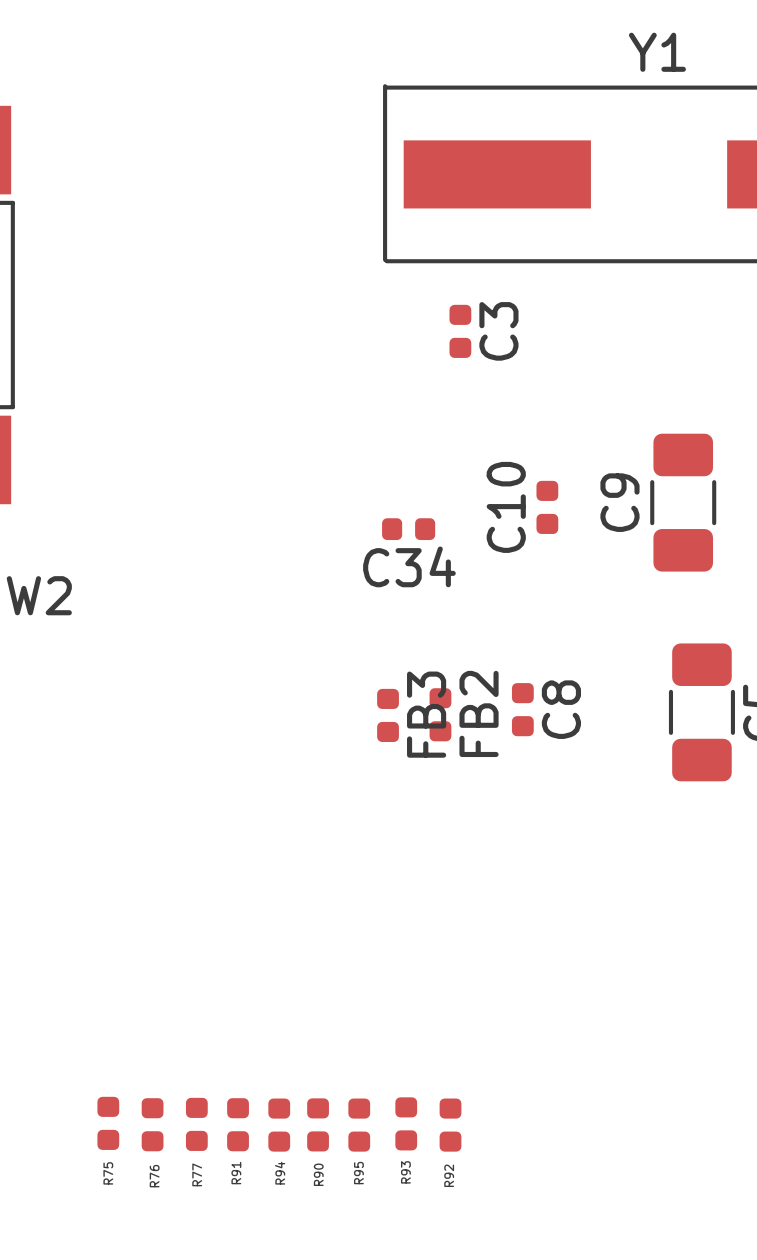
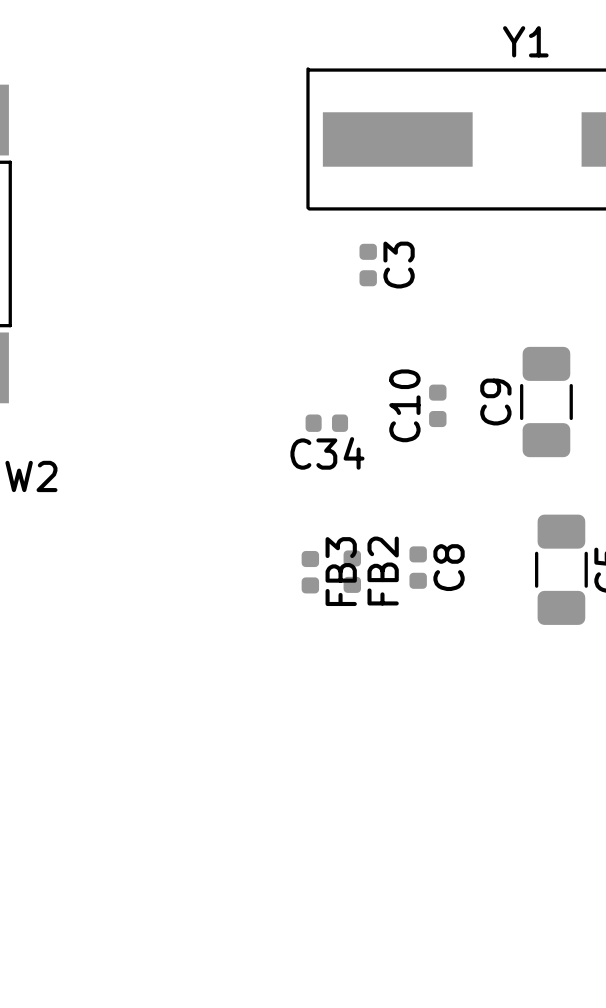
R75: (108, 1123) -> none
R93: (406, 1123) -> none
R76: (152, 1124) -> none
R77: (196, 1124) -> none
R91: (238, 1124) -> none
R90: (318, 1124) -> none
R94: (279, 1125) -> none
R95: (359, 1125) -> none
R92: (450, 1125) -> none

